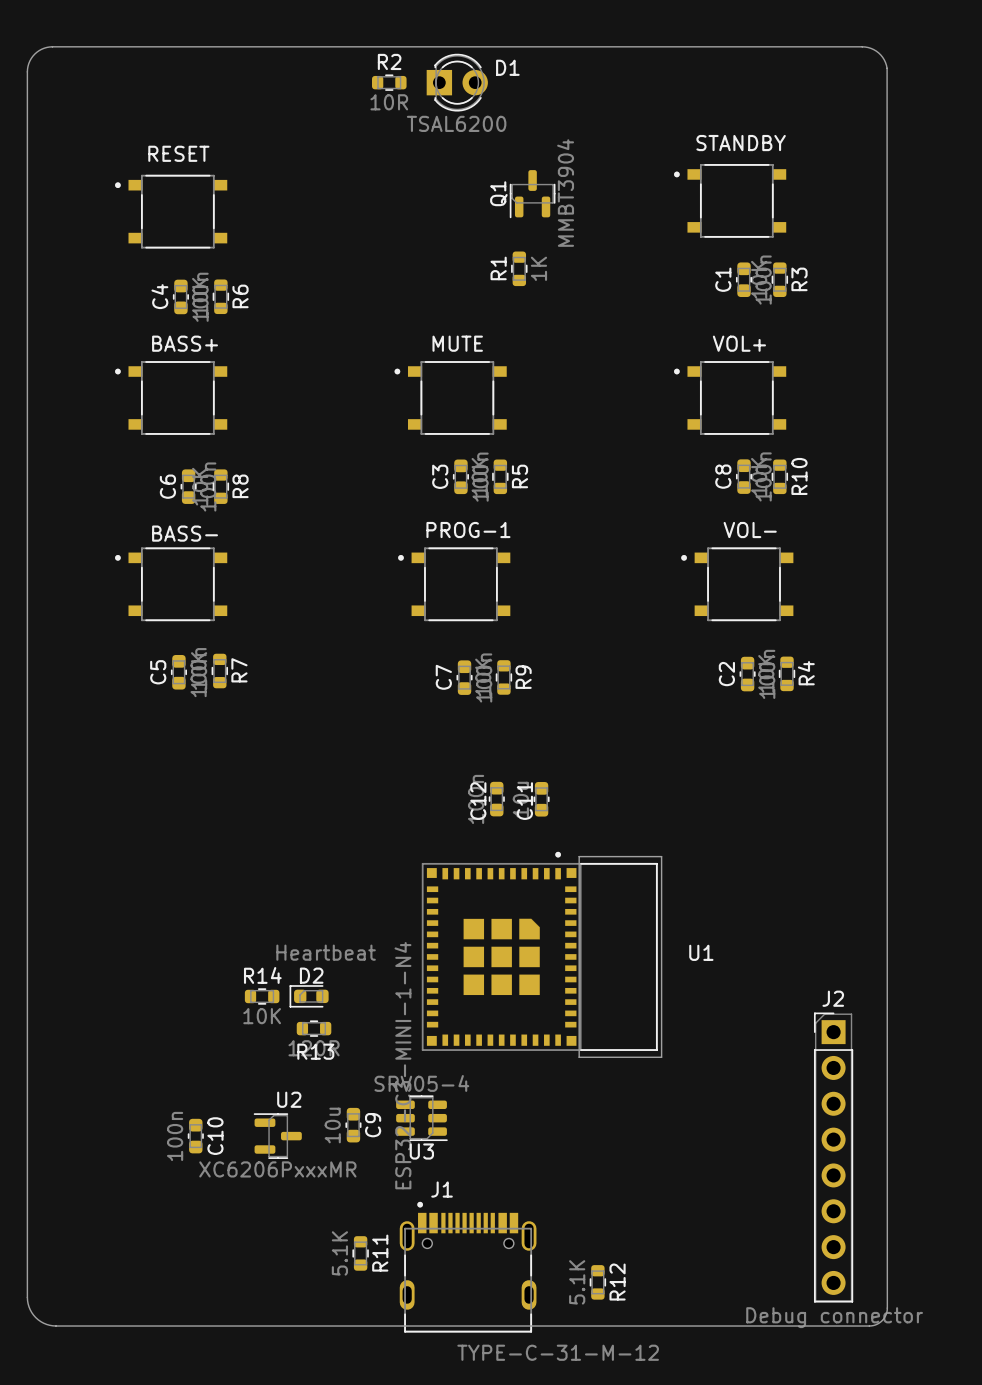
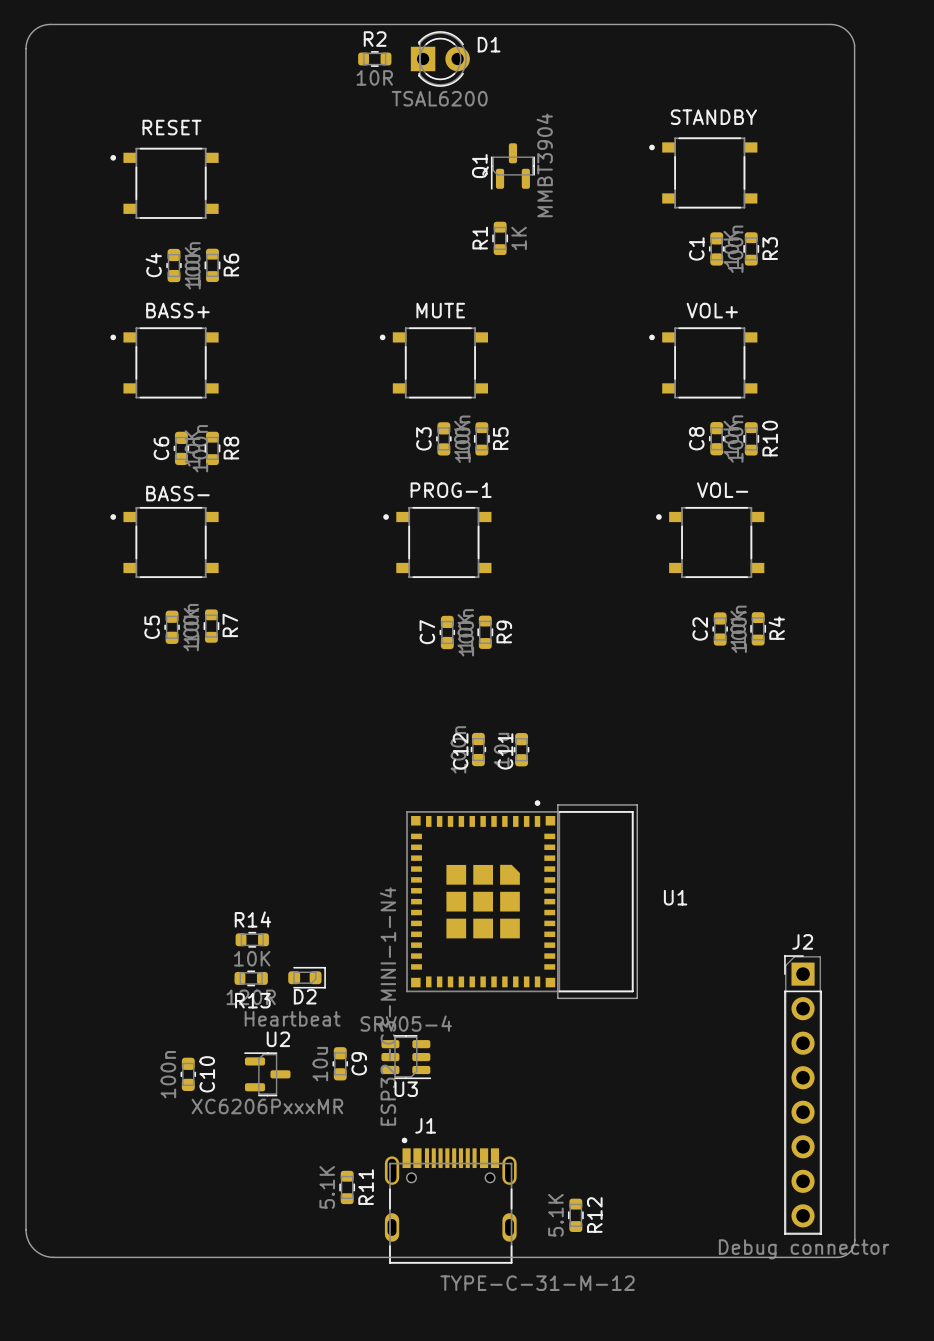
D2 rotation: 0° (309, 996) -> 180° (307, 977)
D2 position: (309, 996) -> (307, 977)
R13 position: (314, 1028) -> (251, 978)

